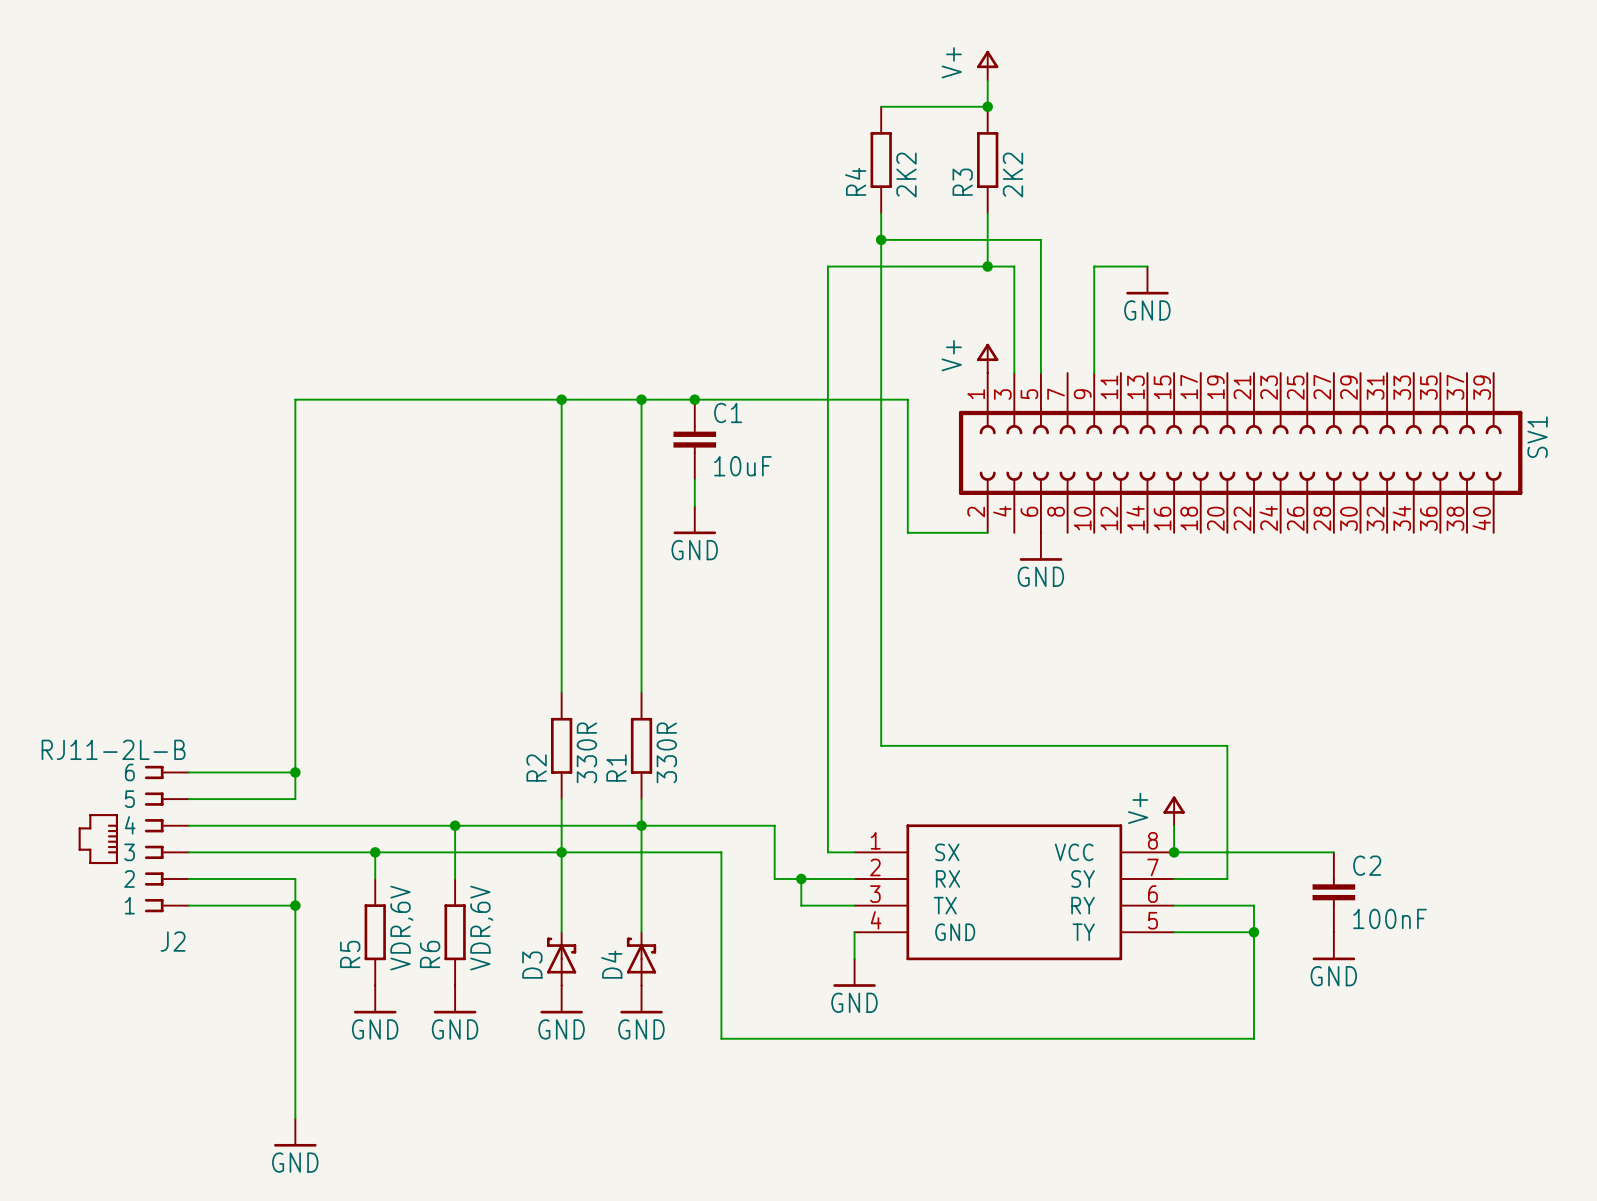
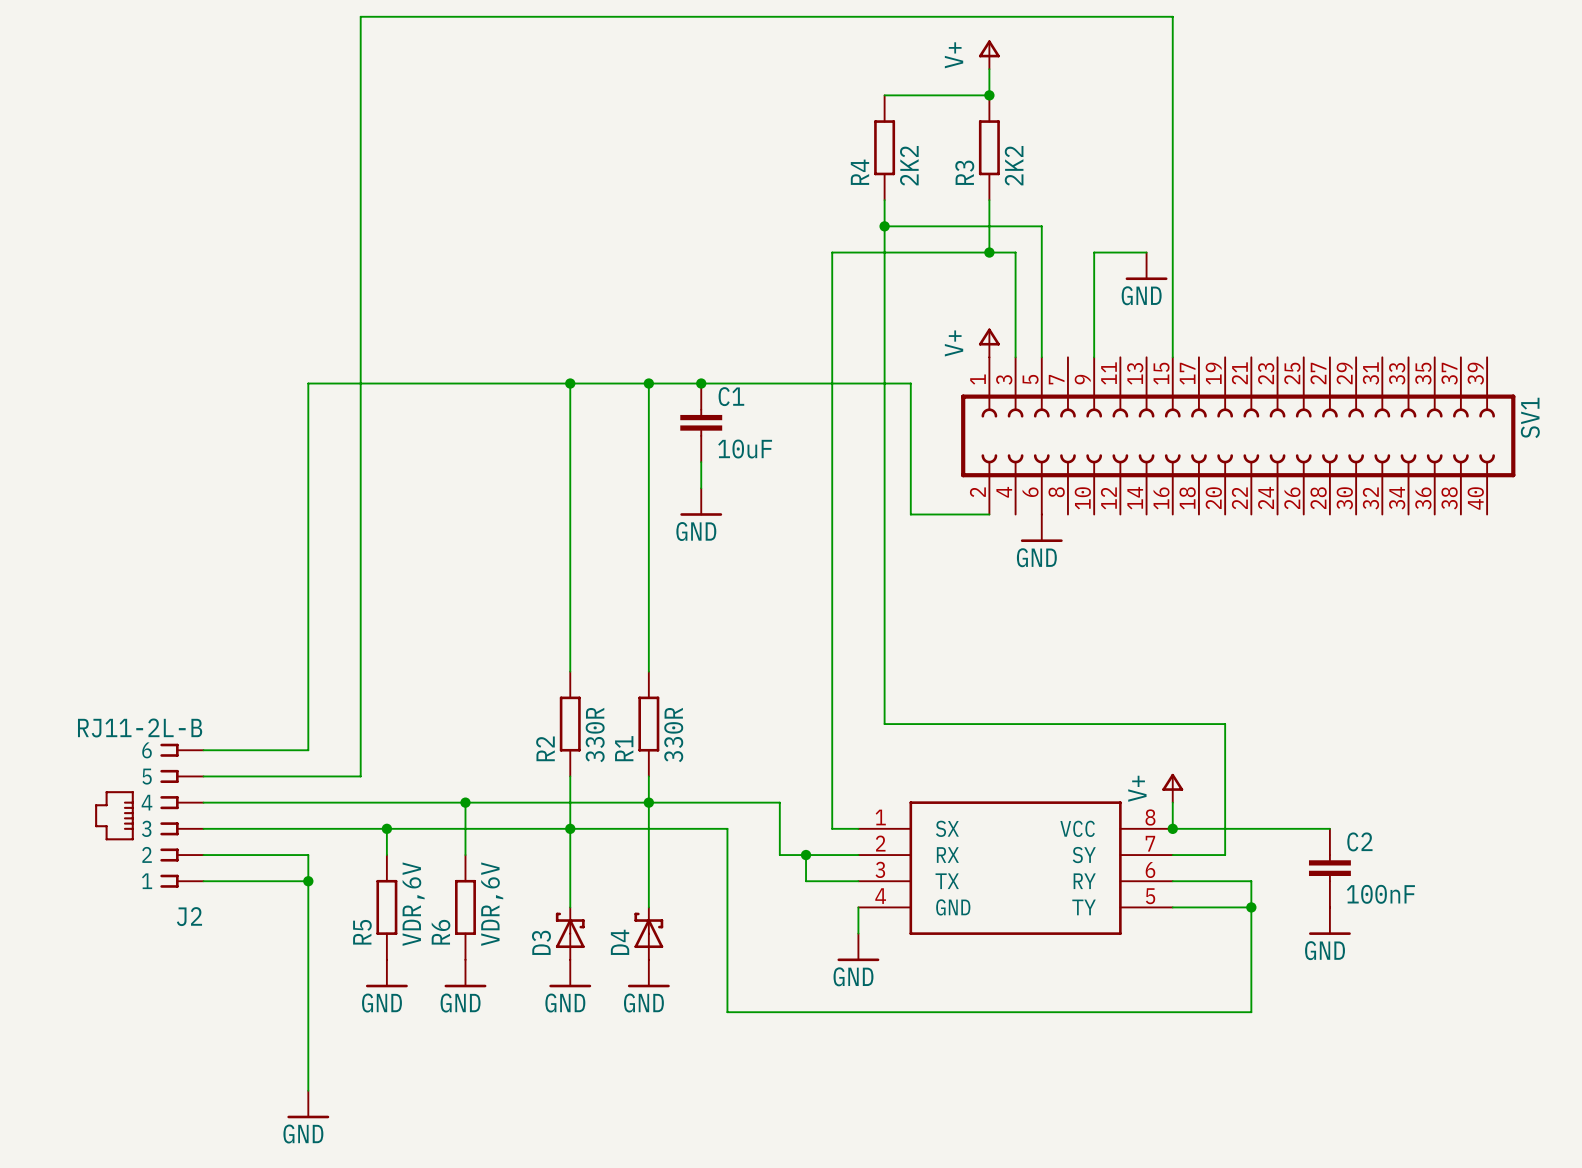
wire: (295, 772) (295, 799) -> (1172, 357) (1172, 16) (360, 16) (360, 776) (308, 776)
junction: (295, 772) -> none

